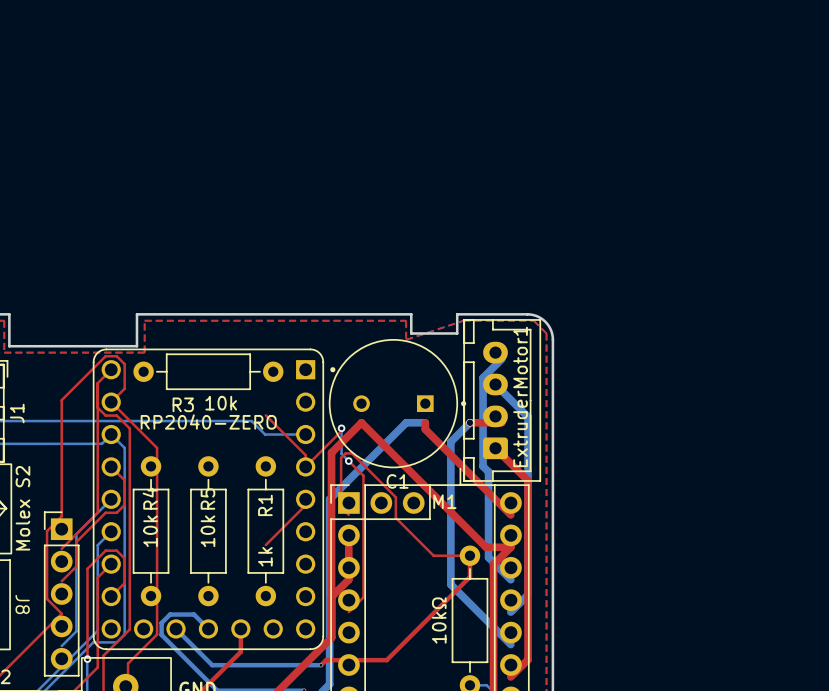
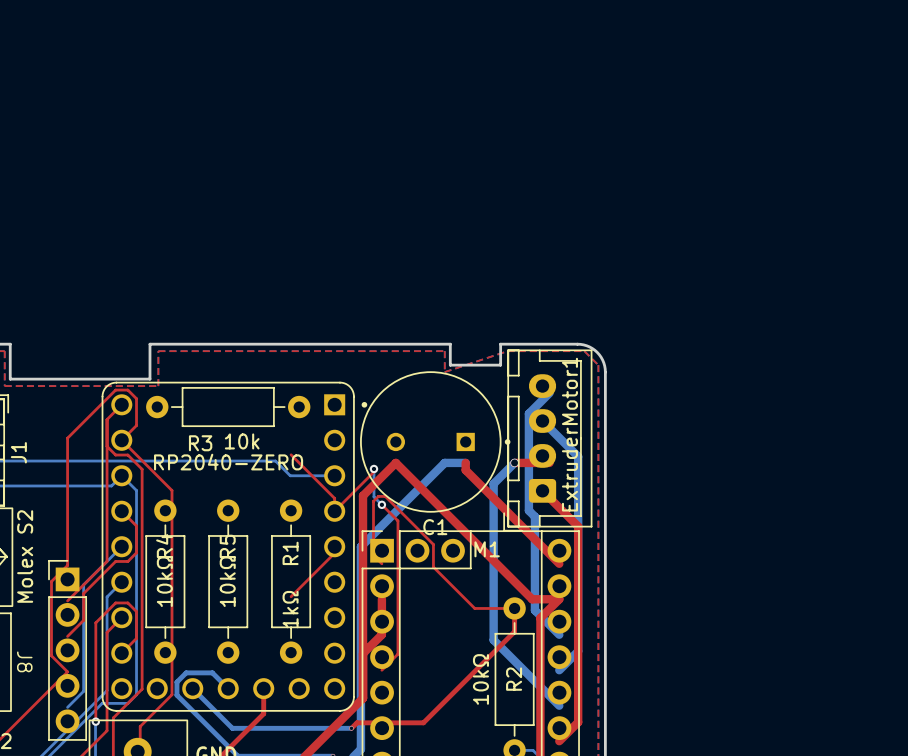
R4 value: 10k (150, 531) -> 10kΩ (164, 581)
R5 value: 10k (207, 531) -> 10kΩ (227, 581)
R1 value: 1k (265, 556) -> 1kΩ (290, 609)
R2 name: none -> R2 (514, 679)

